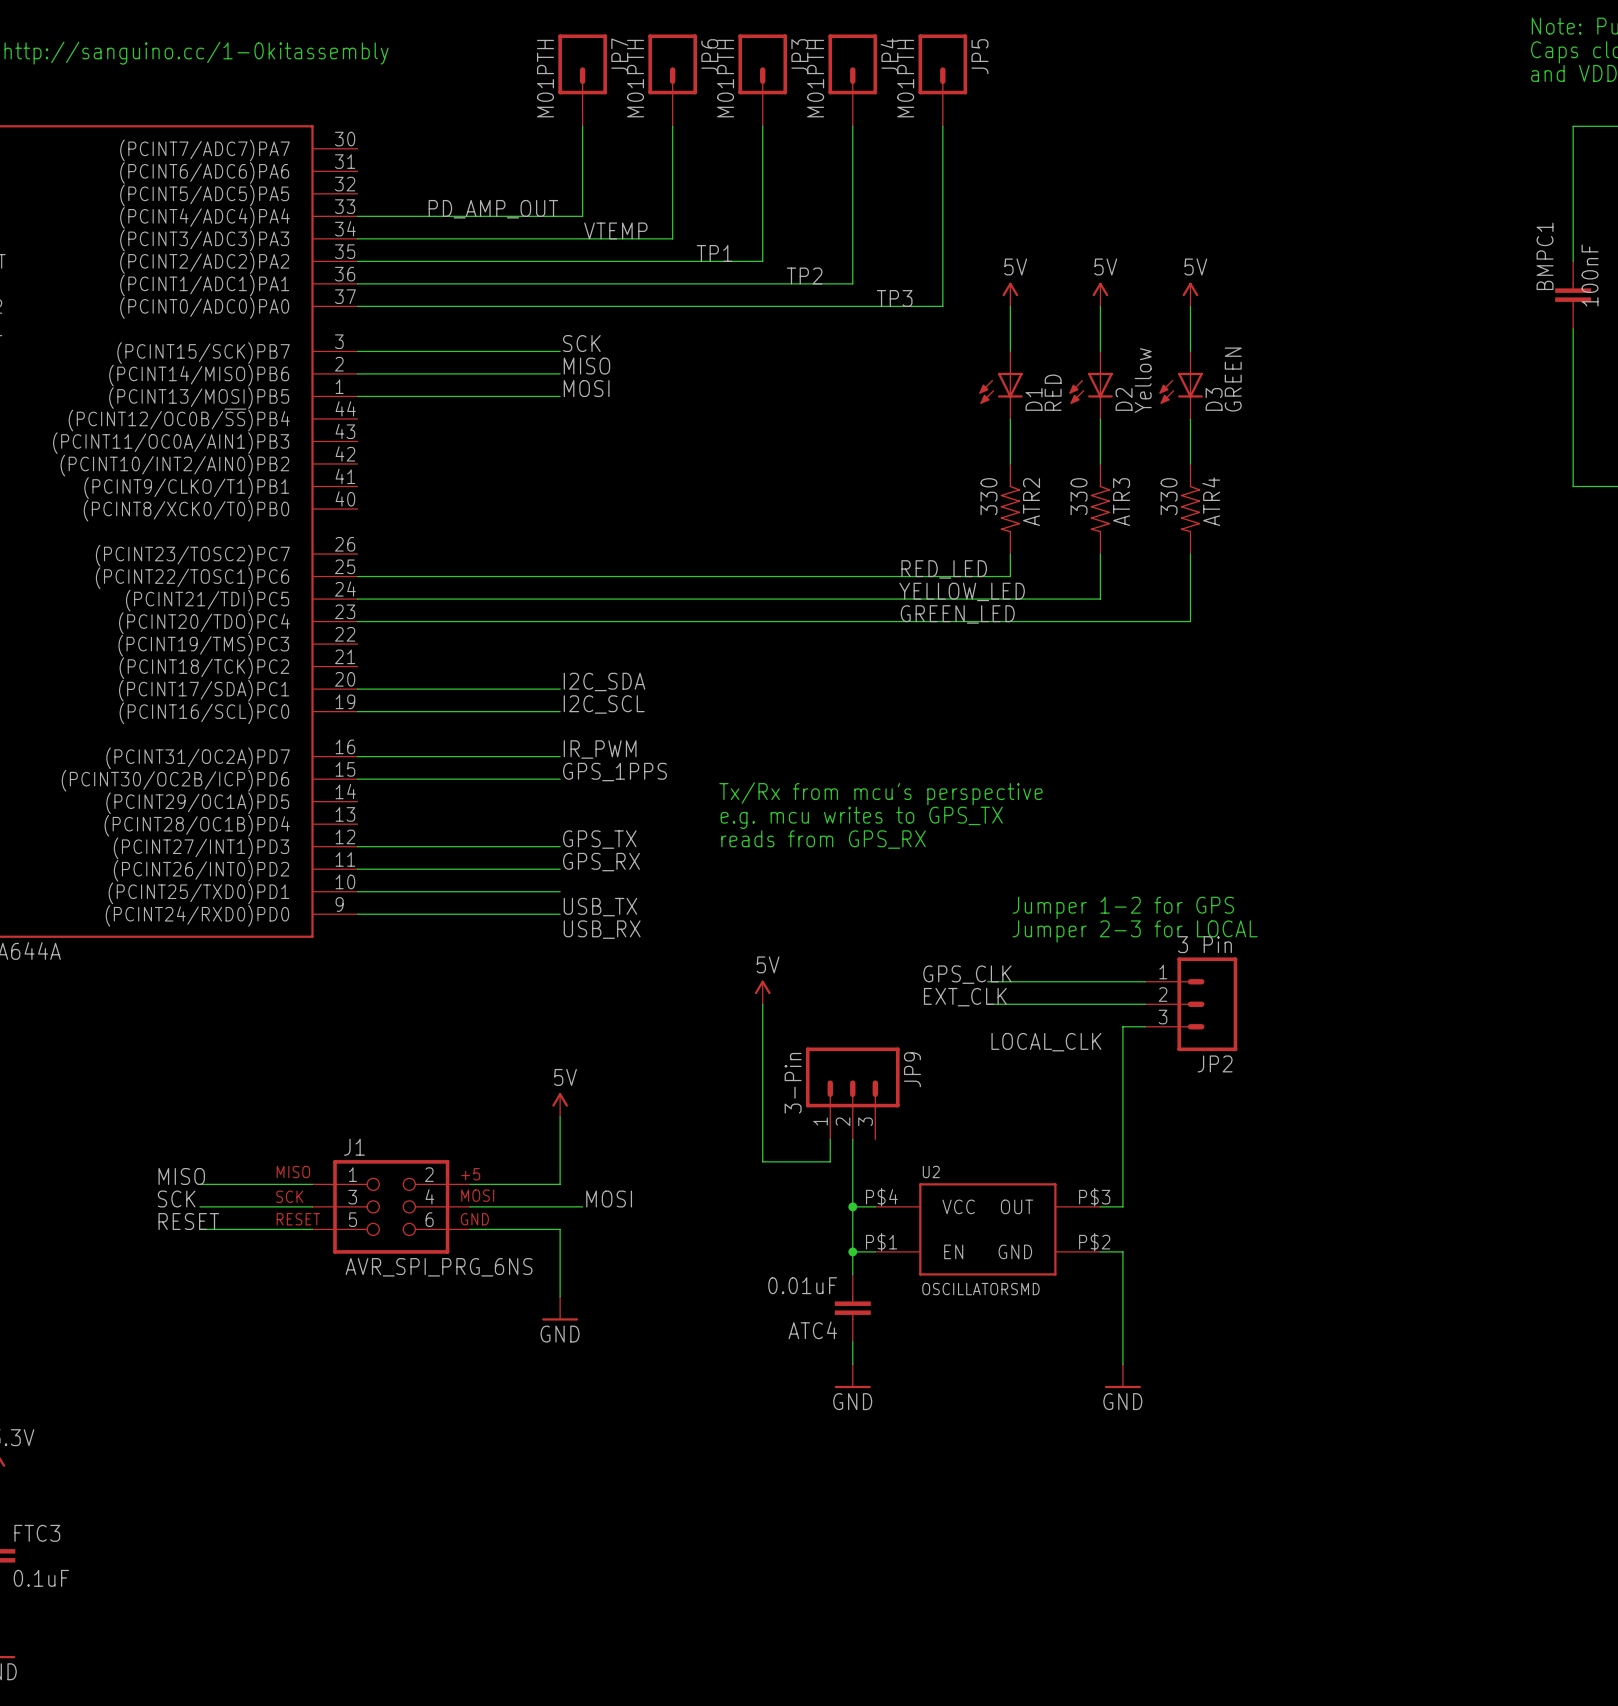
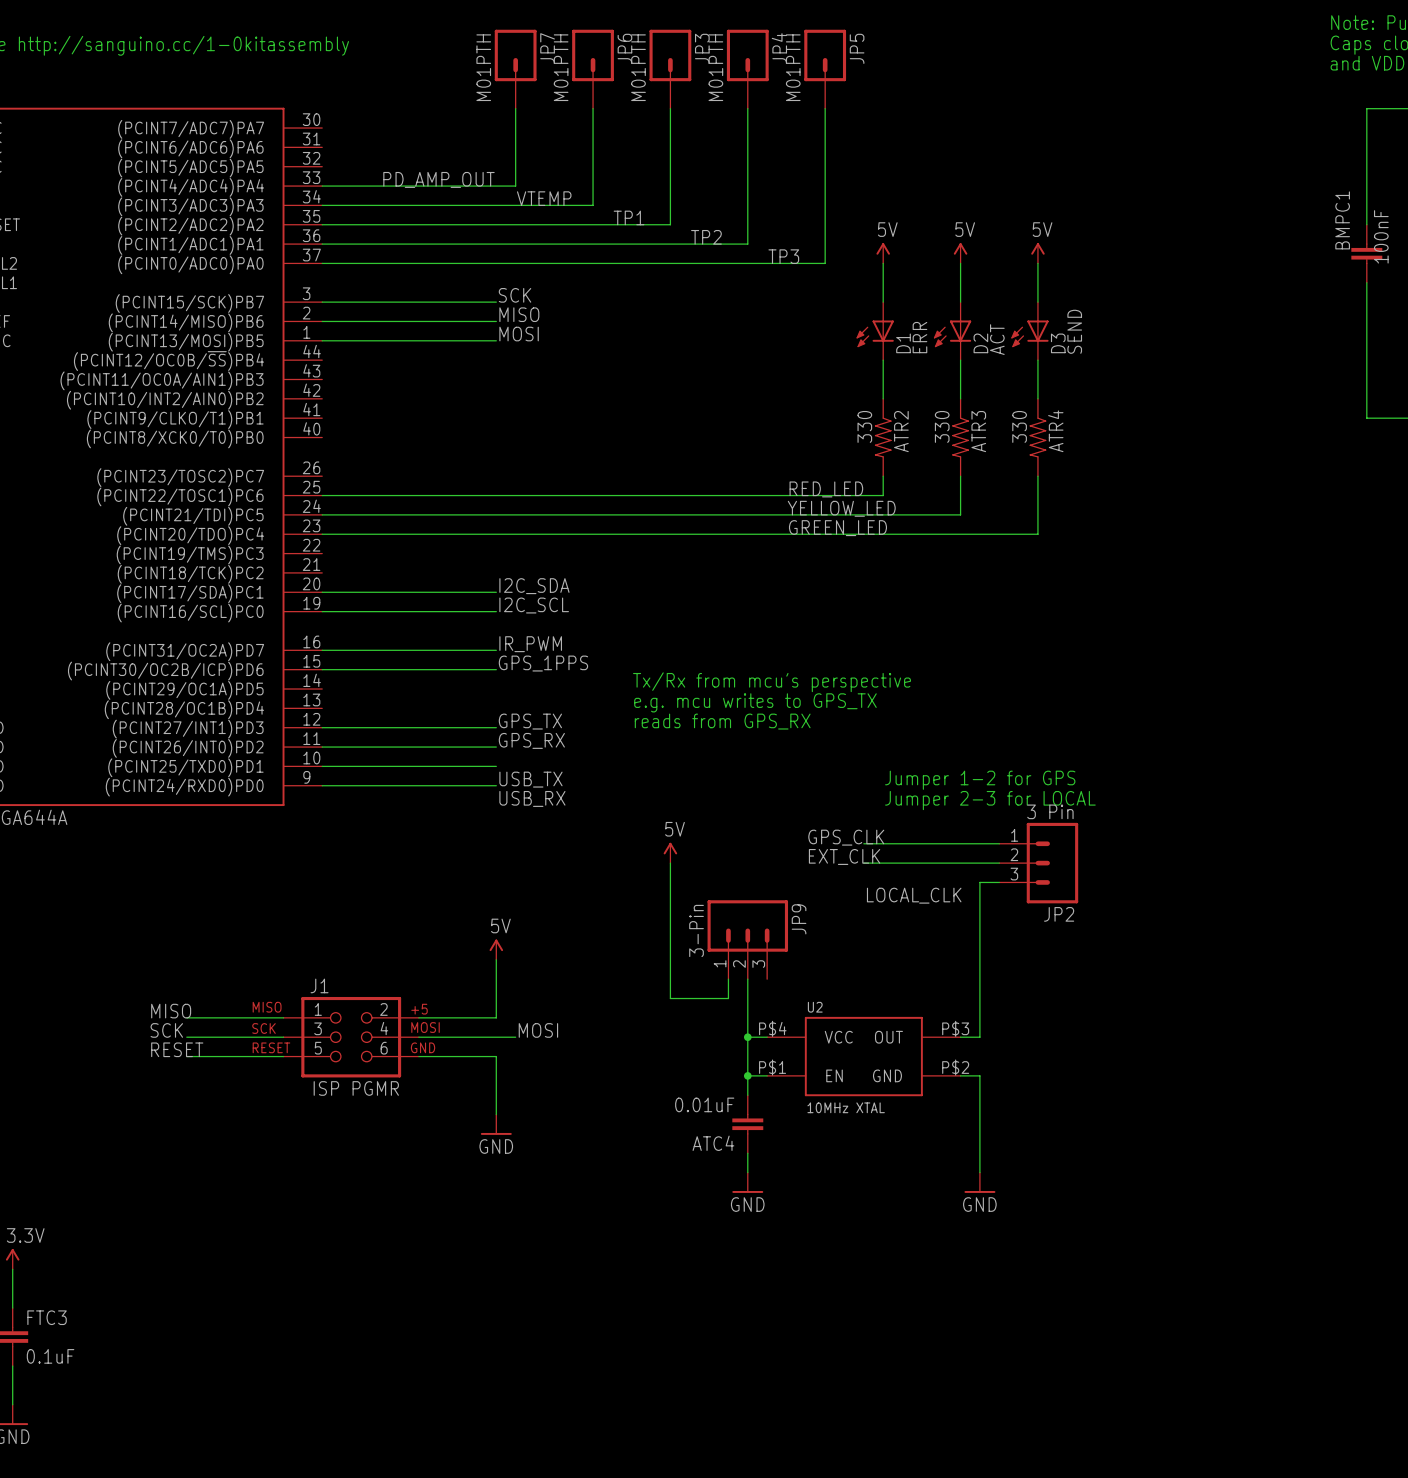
D3 value: GREEN (1233, 379) -> SEND (1074, 331)
D2 value: Yellow (1143, 380) -> ACT (997, 339)
D1 value: RED (1053, 392) -> ERR (919, 337)
J1 value: AVR_SPI_PRG_6NS (439, 1267) -> ISP PGMR (356, 1088)
U2 value: OSCILLATORSMD (980, 1289) -> 10MHz XTAL (846, 1107)

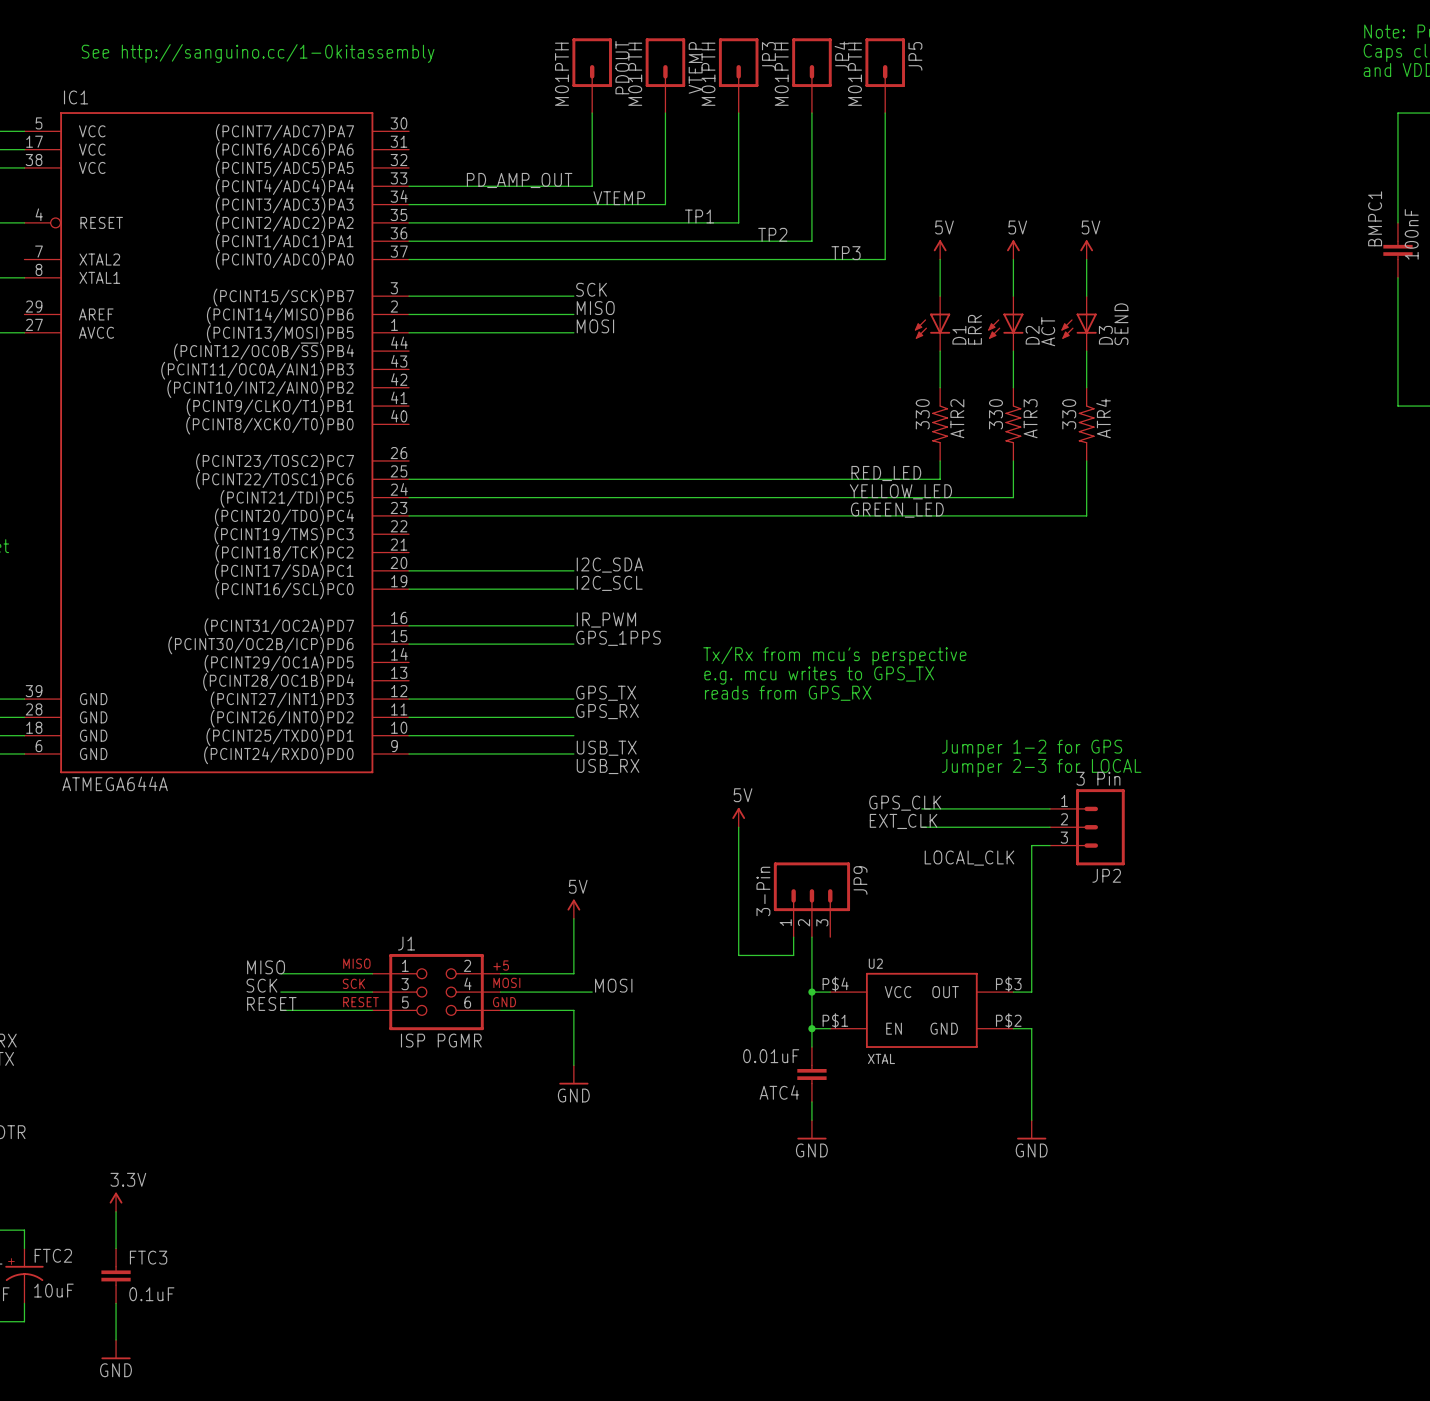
JP7 name: JP7 (547, 48) -> PDOUT (622, 67)
JP6 name: JP6 (624, 48) -> VTEMP (695, 67)
U2 value: 10MHz XTAL (846, 1107) -> XTAL (881, 1058)

